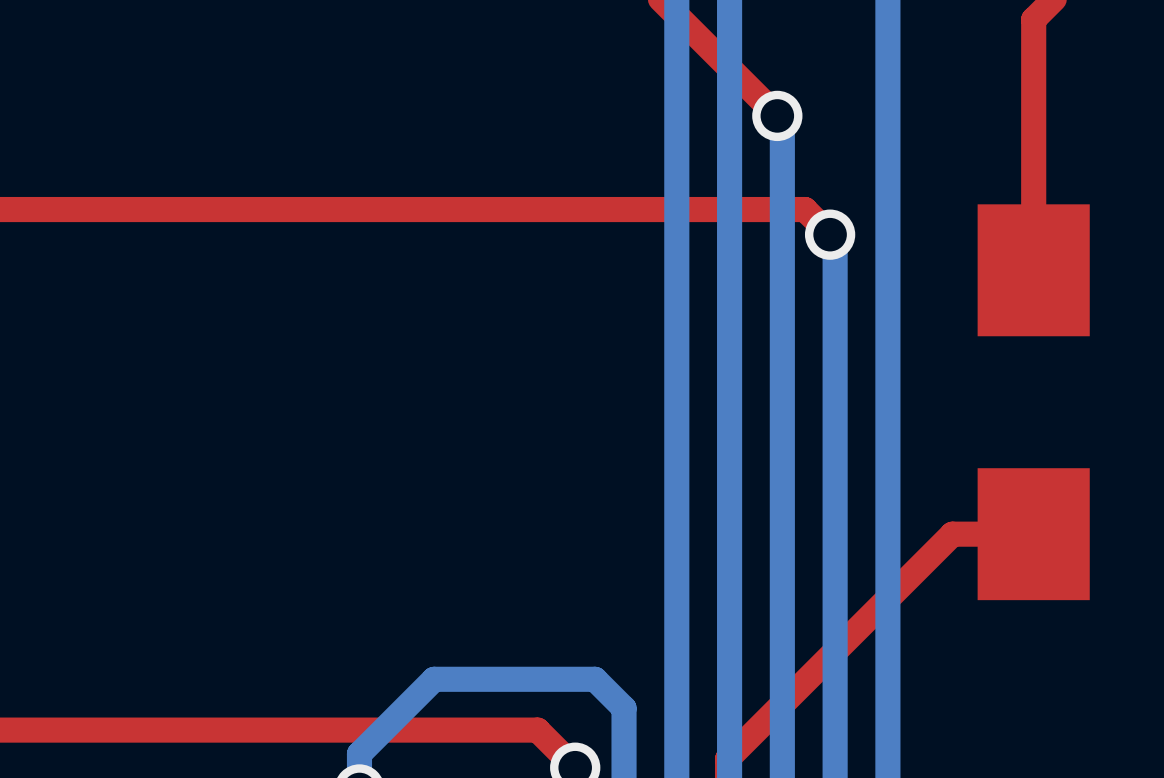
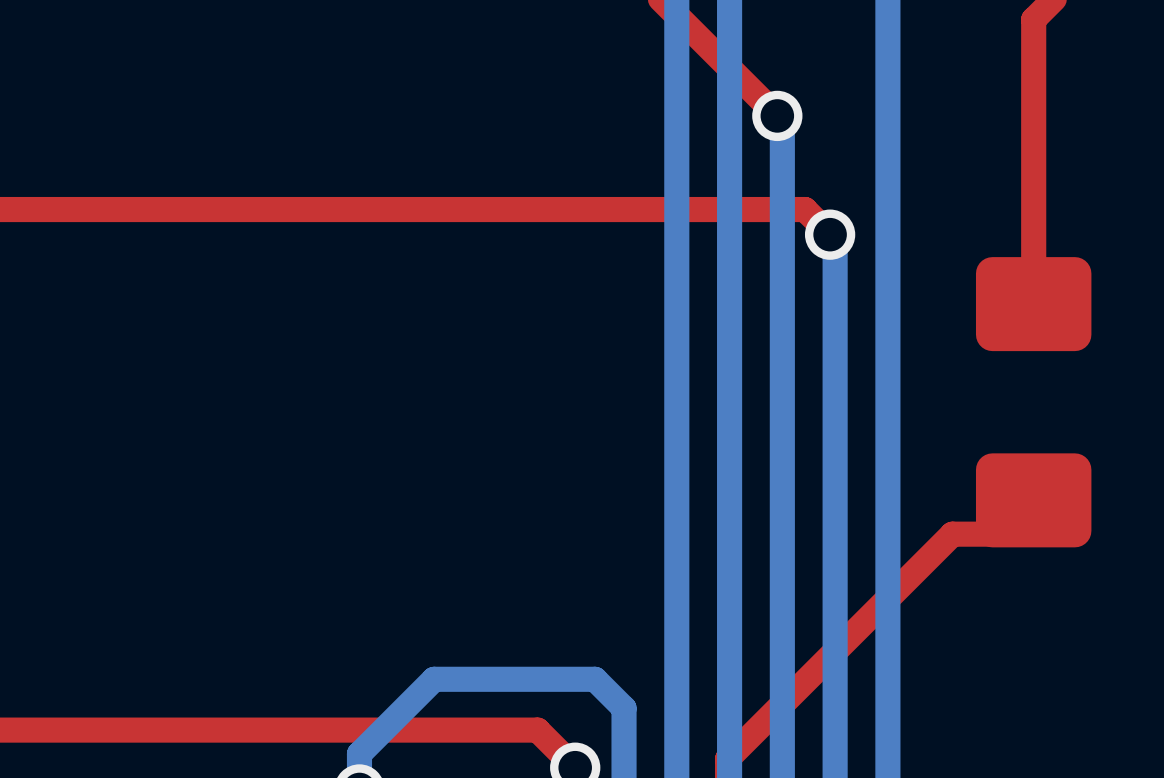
part footprint: [977, 204, 1090, 601] -> [975, 257, 1092, 548]

